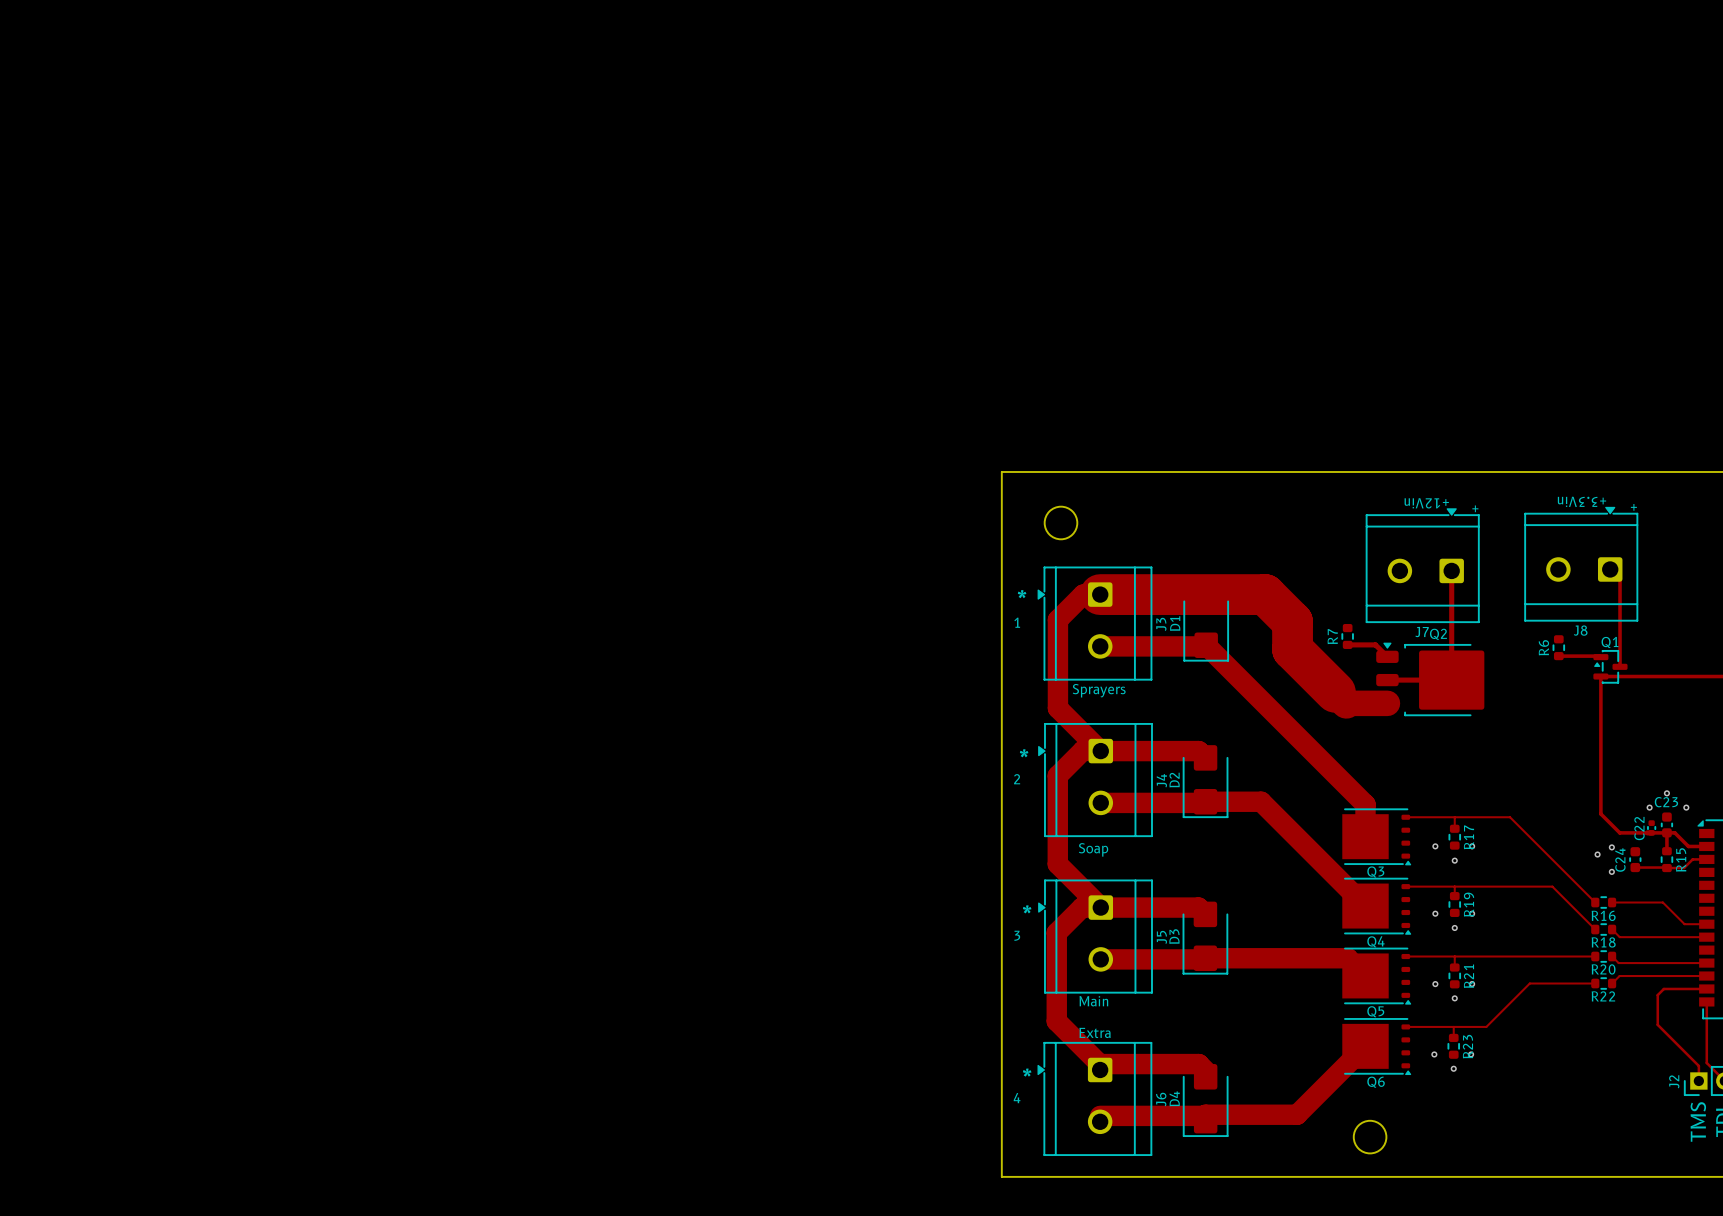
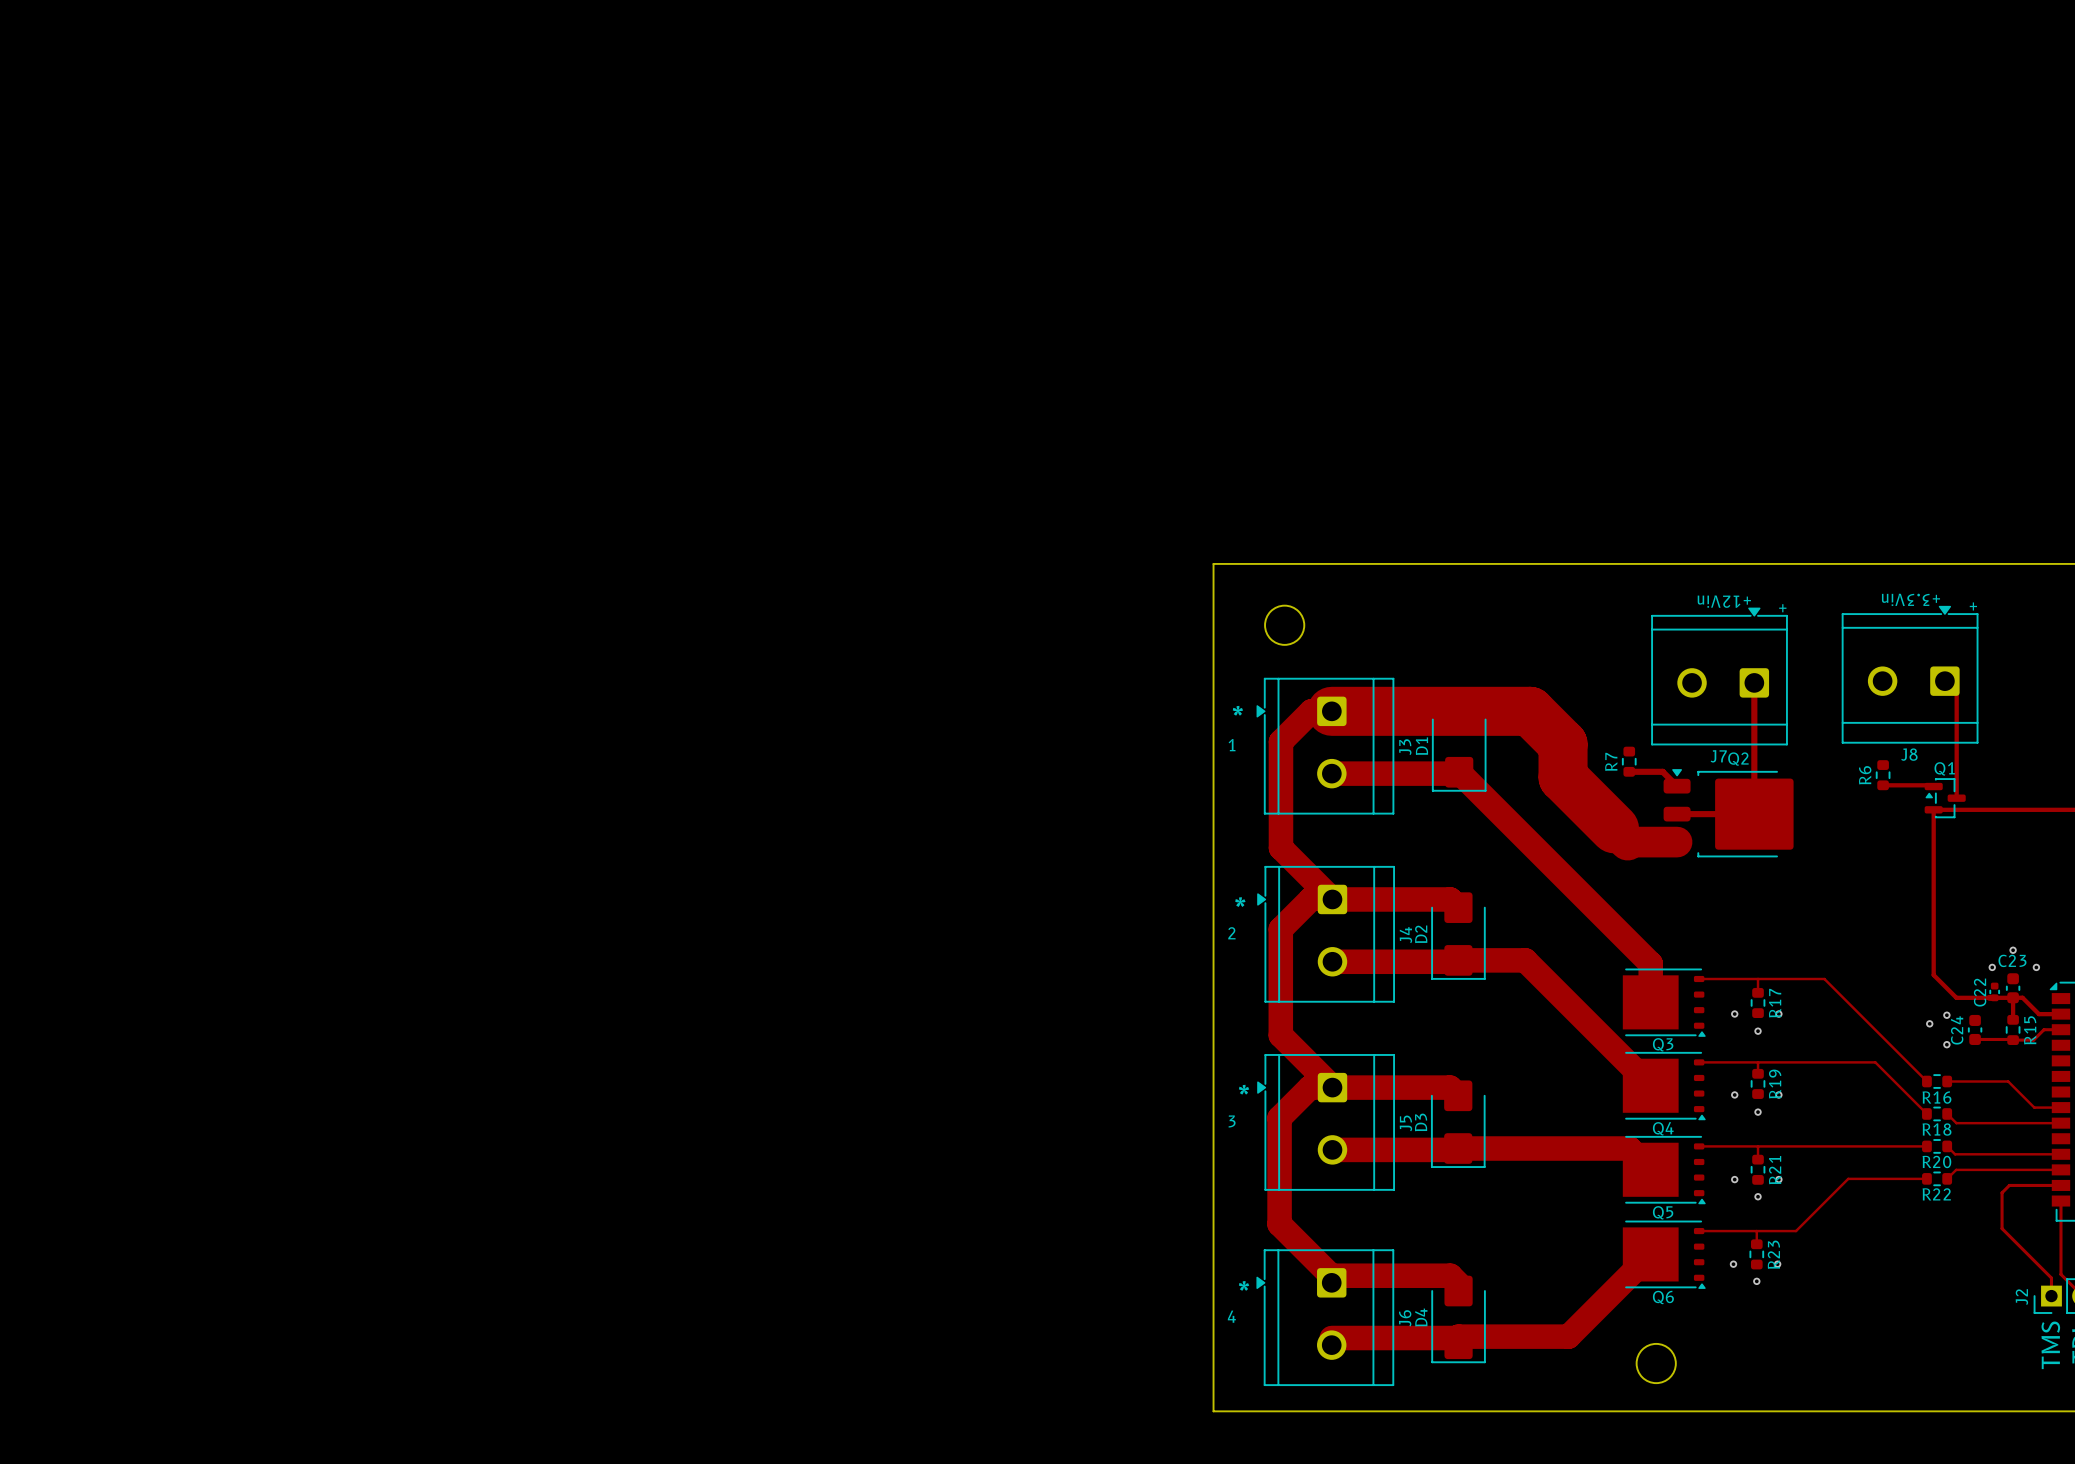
text: Sprayers (1099, 690) -> none
text: Soap (1093, 849) -> none
text: Main (1093, 1001) -> none
text: Extra (1095, 1032) -> none

